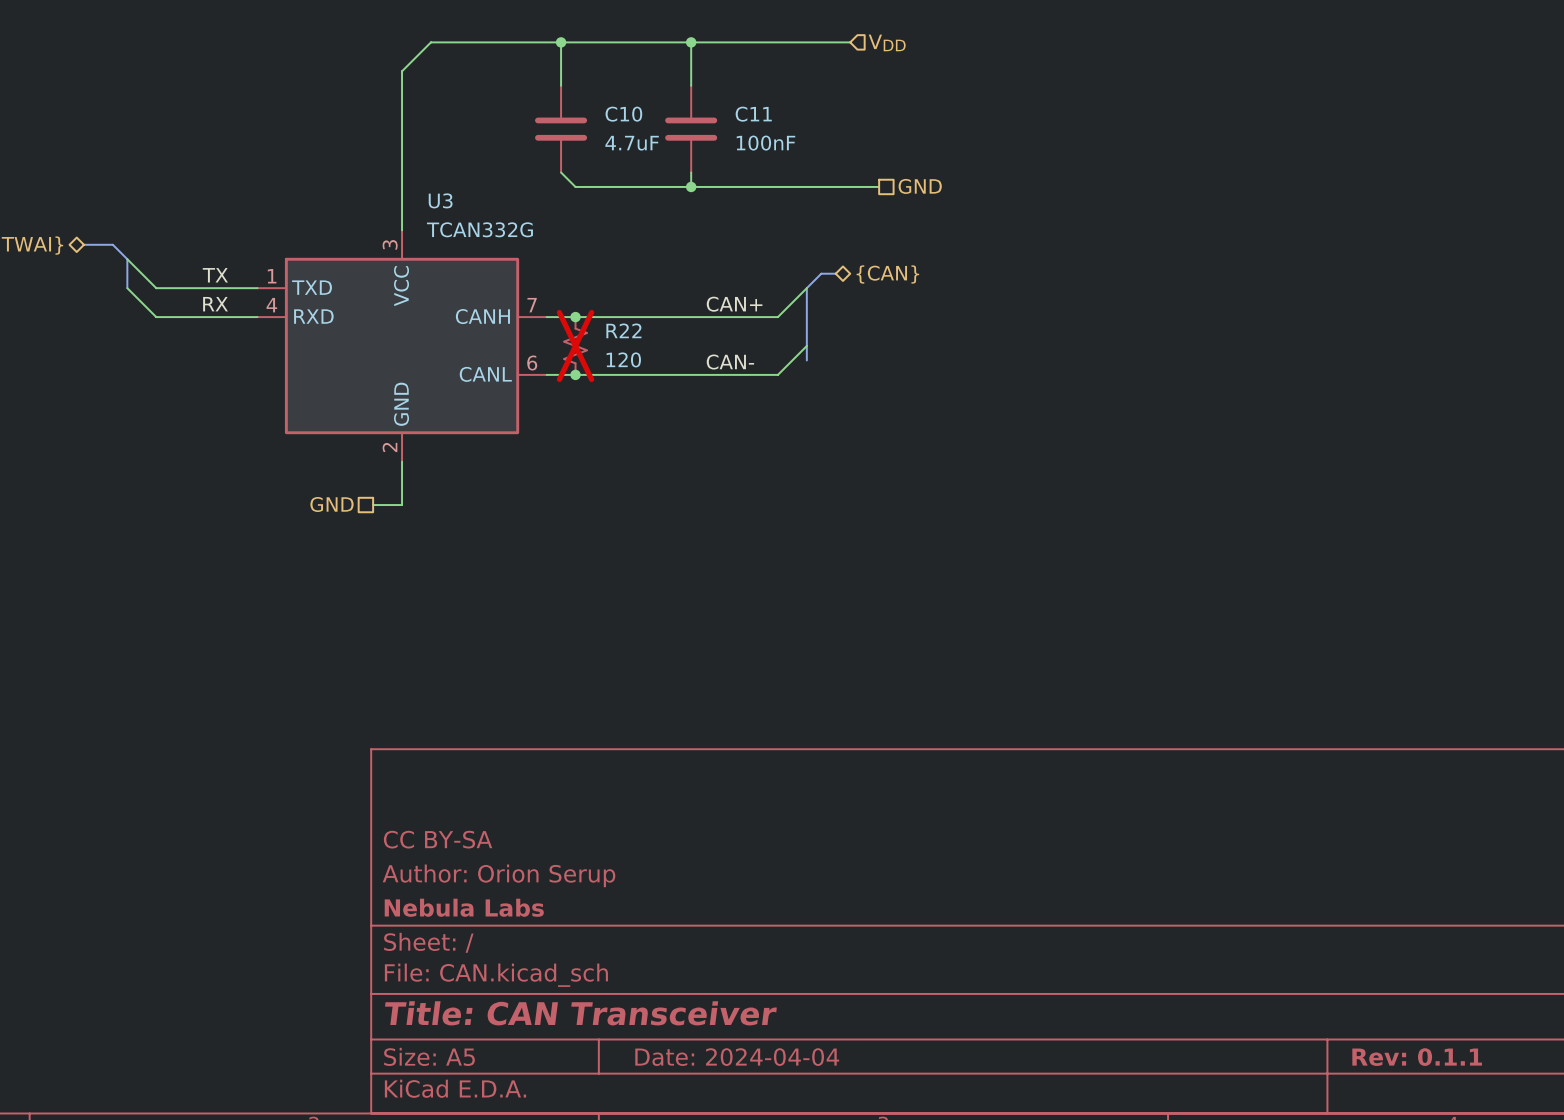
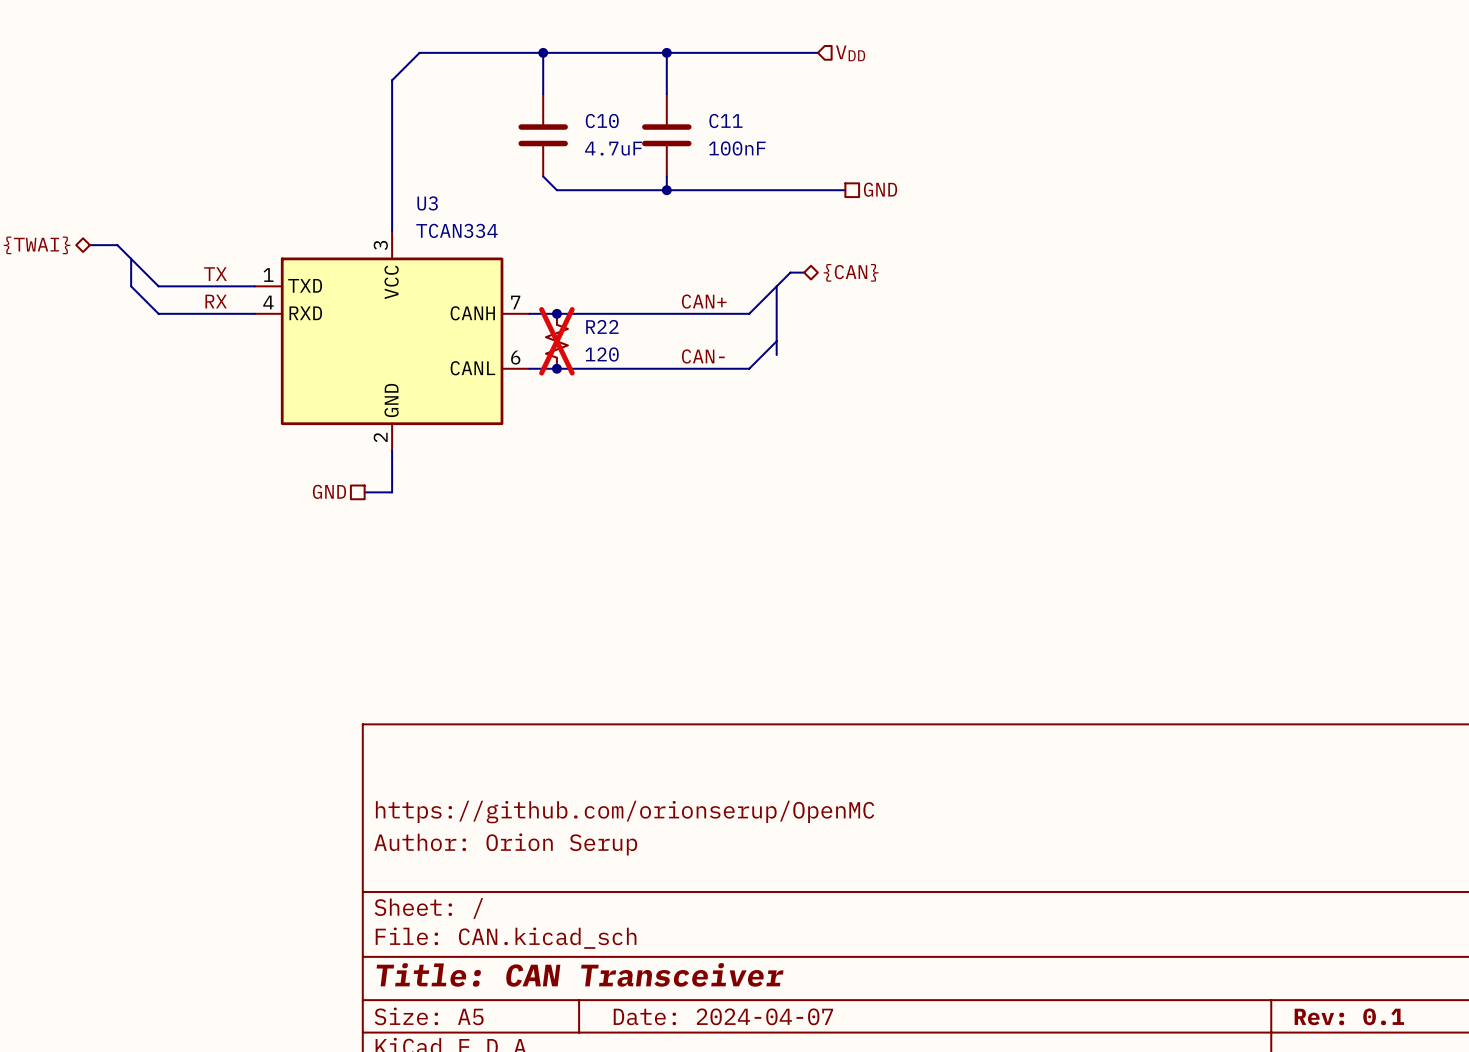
U3 value: TCAN332G (479, 229) -> TCAN334 (457, 230)
title block: CC BY-SA (438, 839) -> https://github.com/orionserup/OpenMC (625, 812)
title block: Nebula Labs (464, 907) -> none
title block: Date: 2024-04-04 (737, 1057) -> Date: 2024-04-07 (723, 1016)
title block: Rev: 0.1.1 (1417, 1057) -> Rev: 0.1 (1349, 1016)

